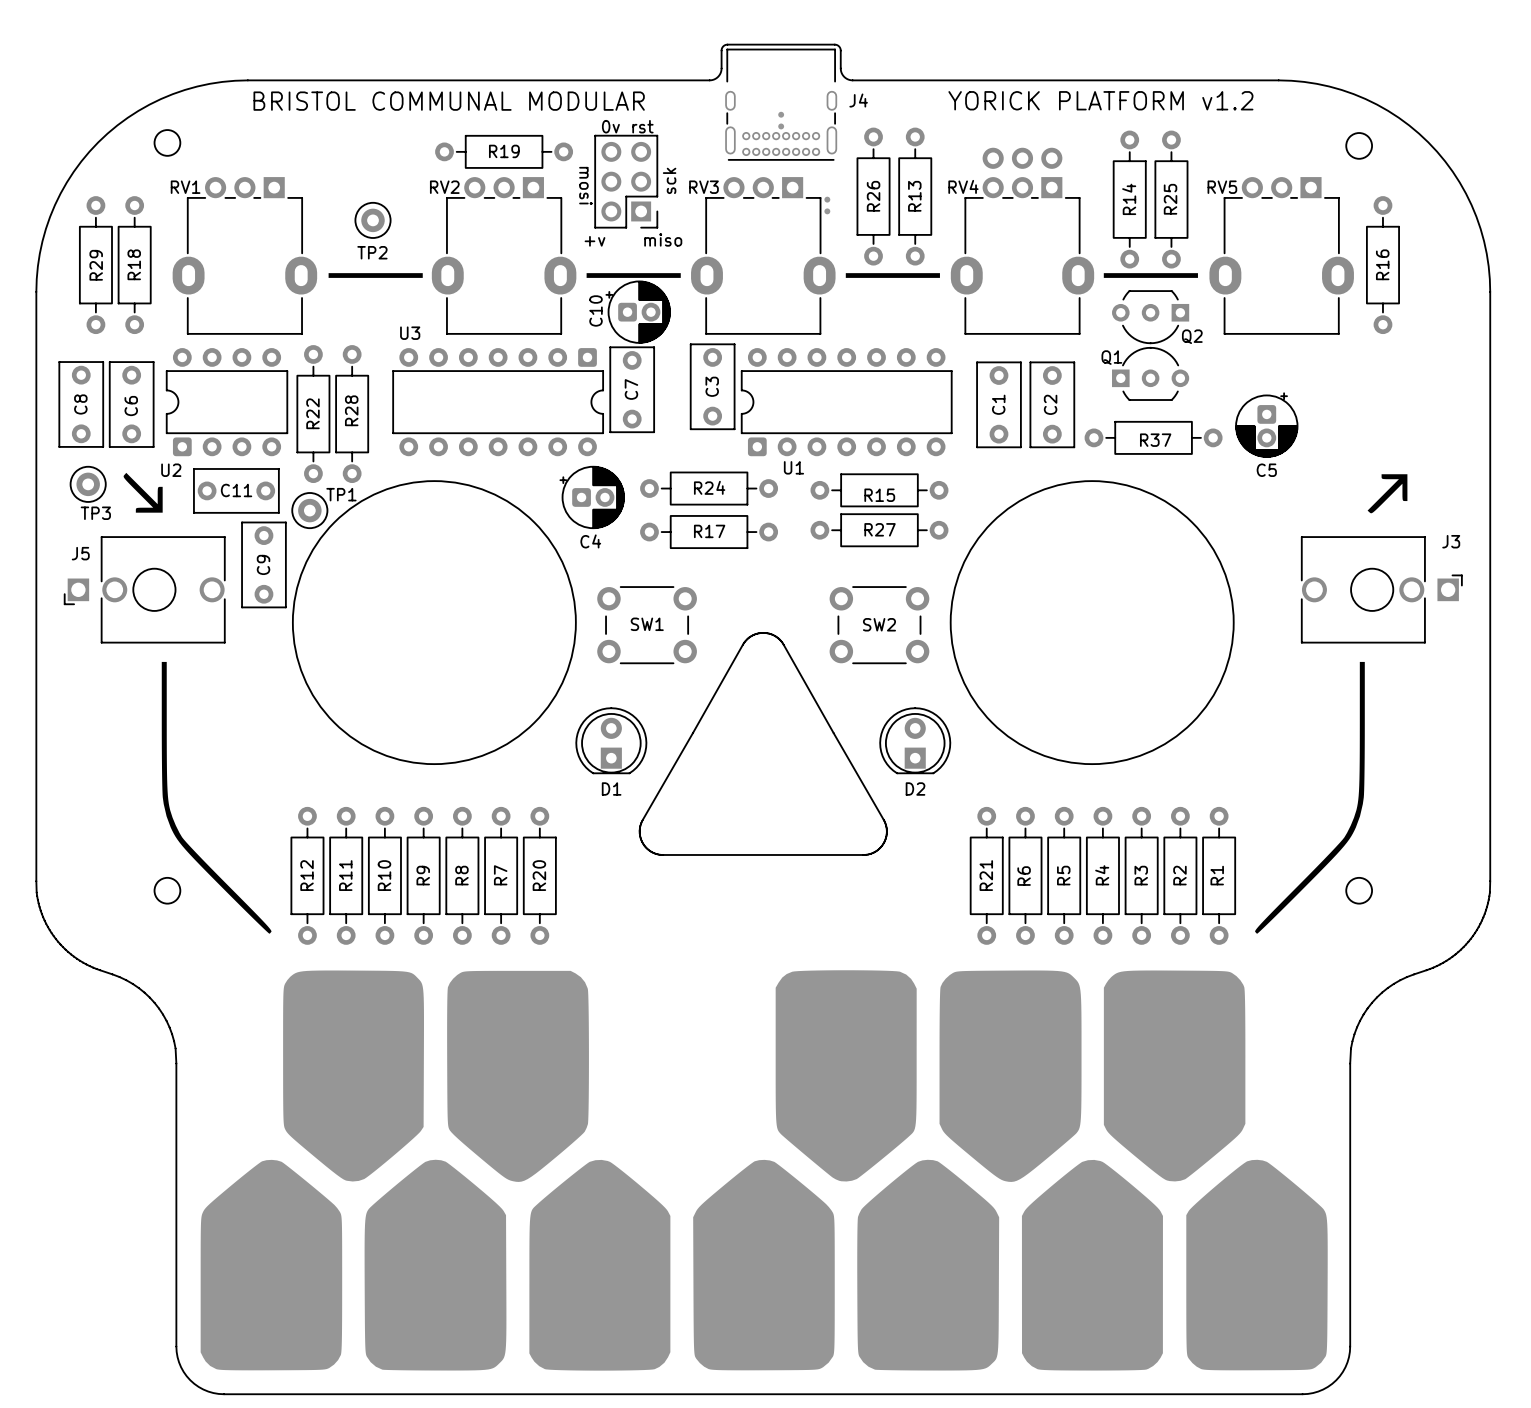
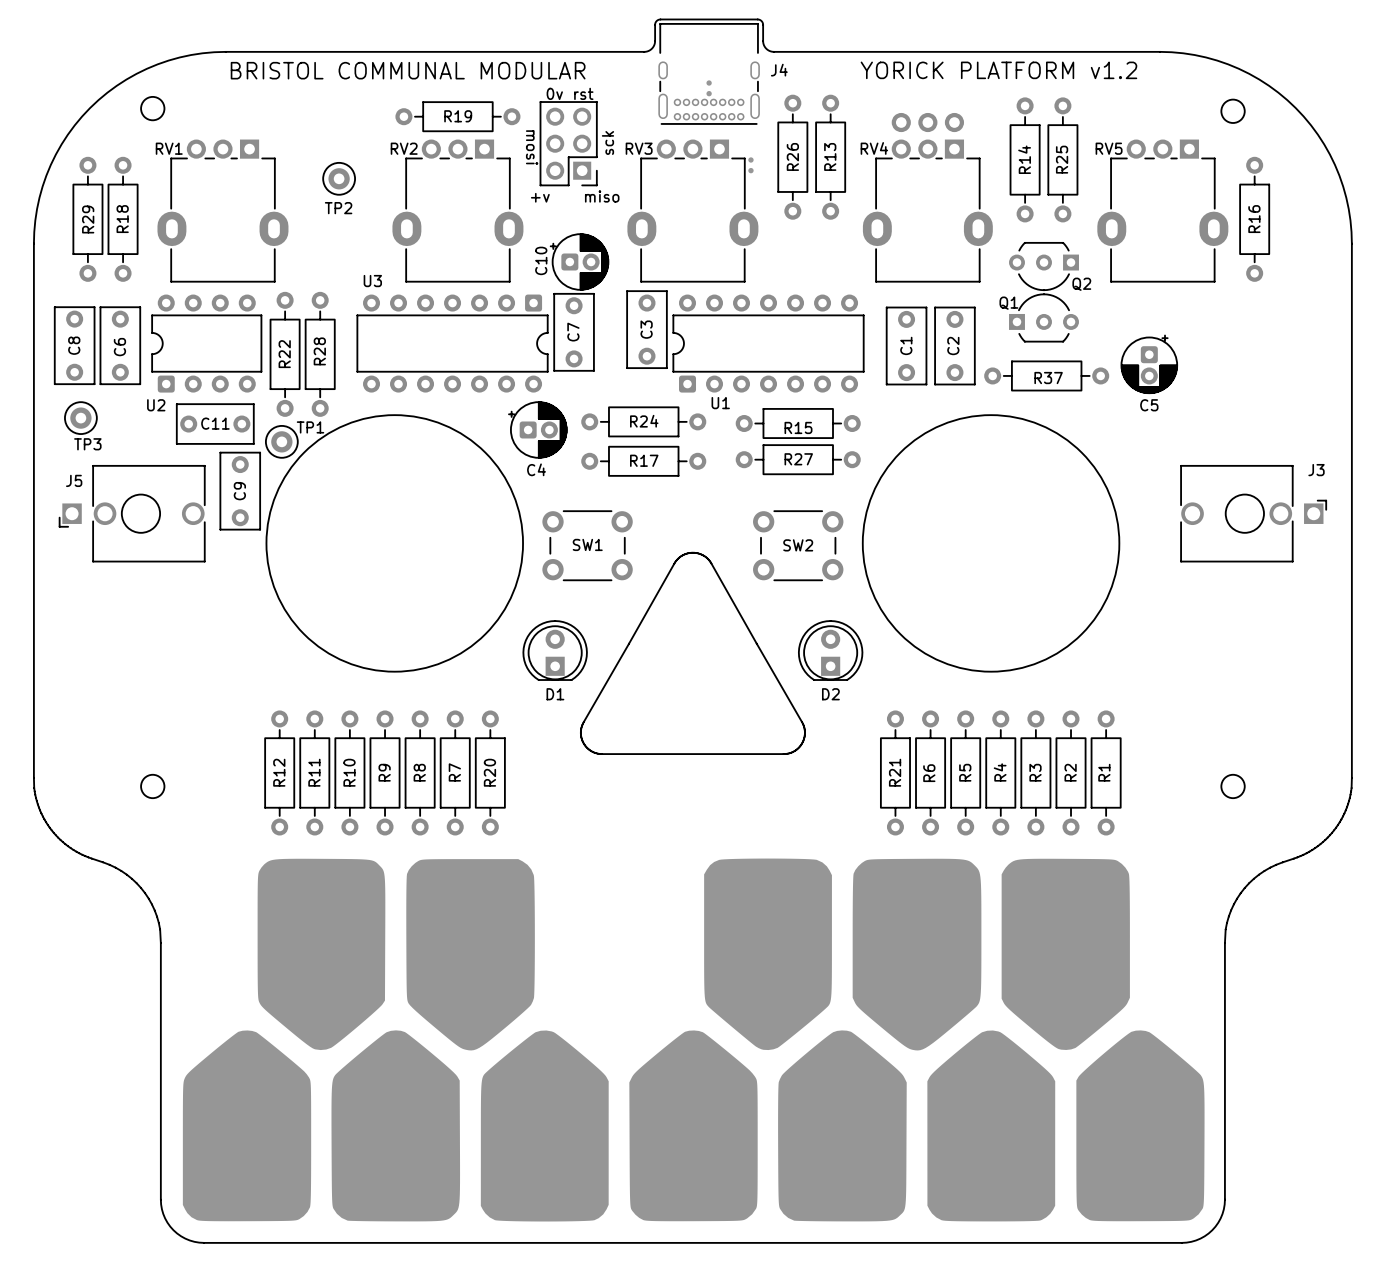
drawing: [123, 273, 1408, 934] -> none

